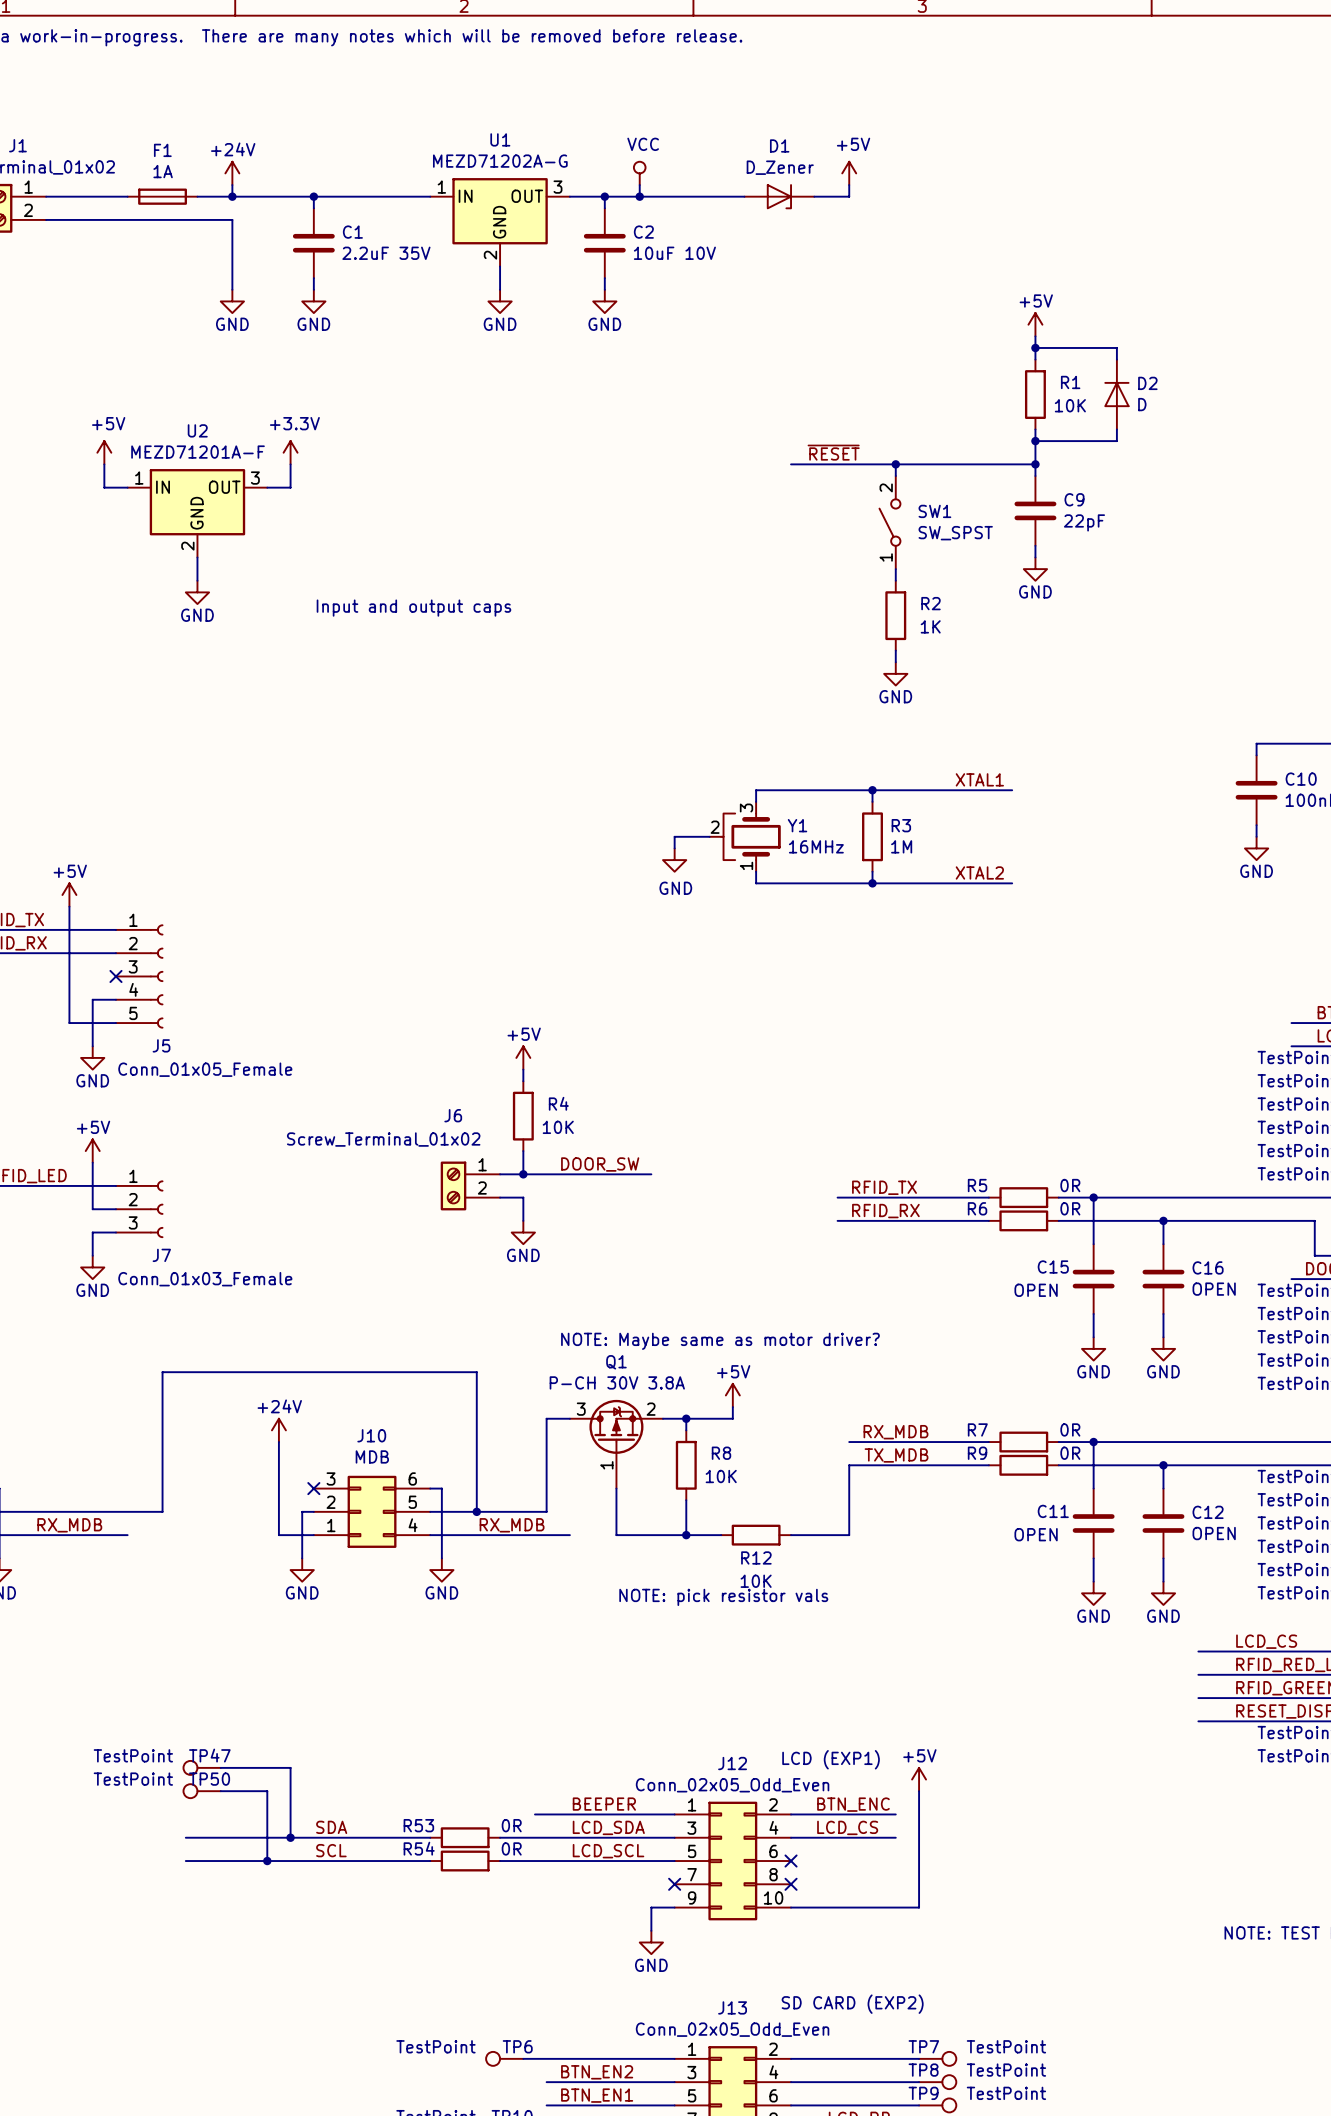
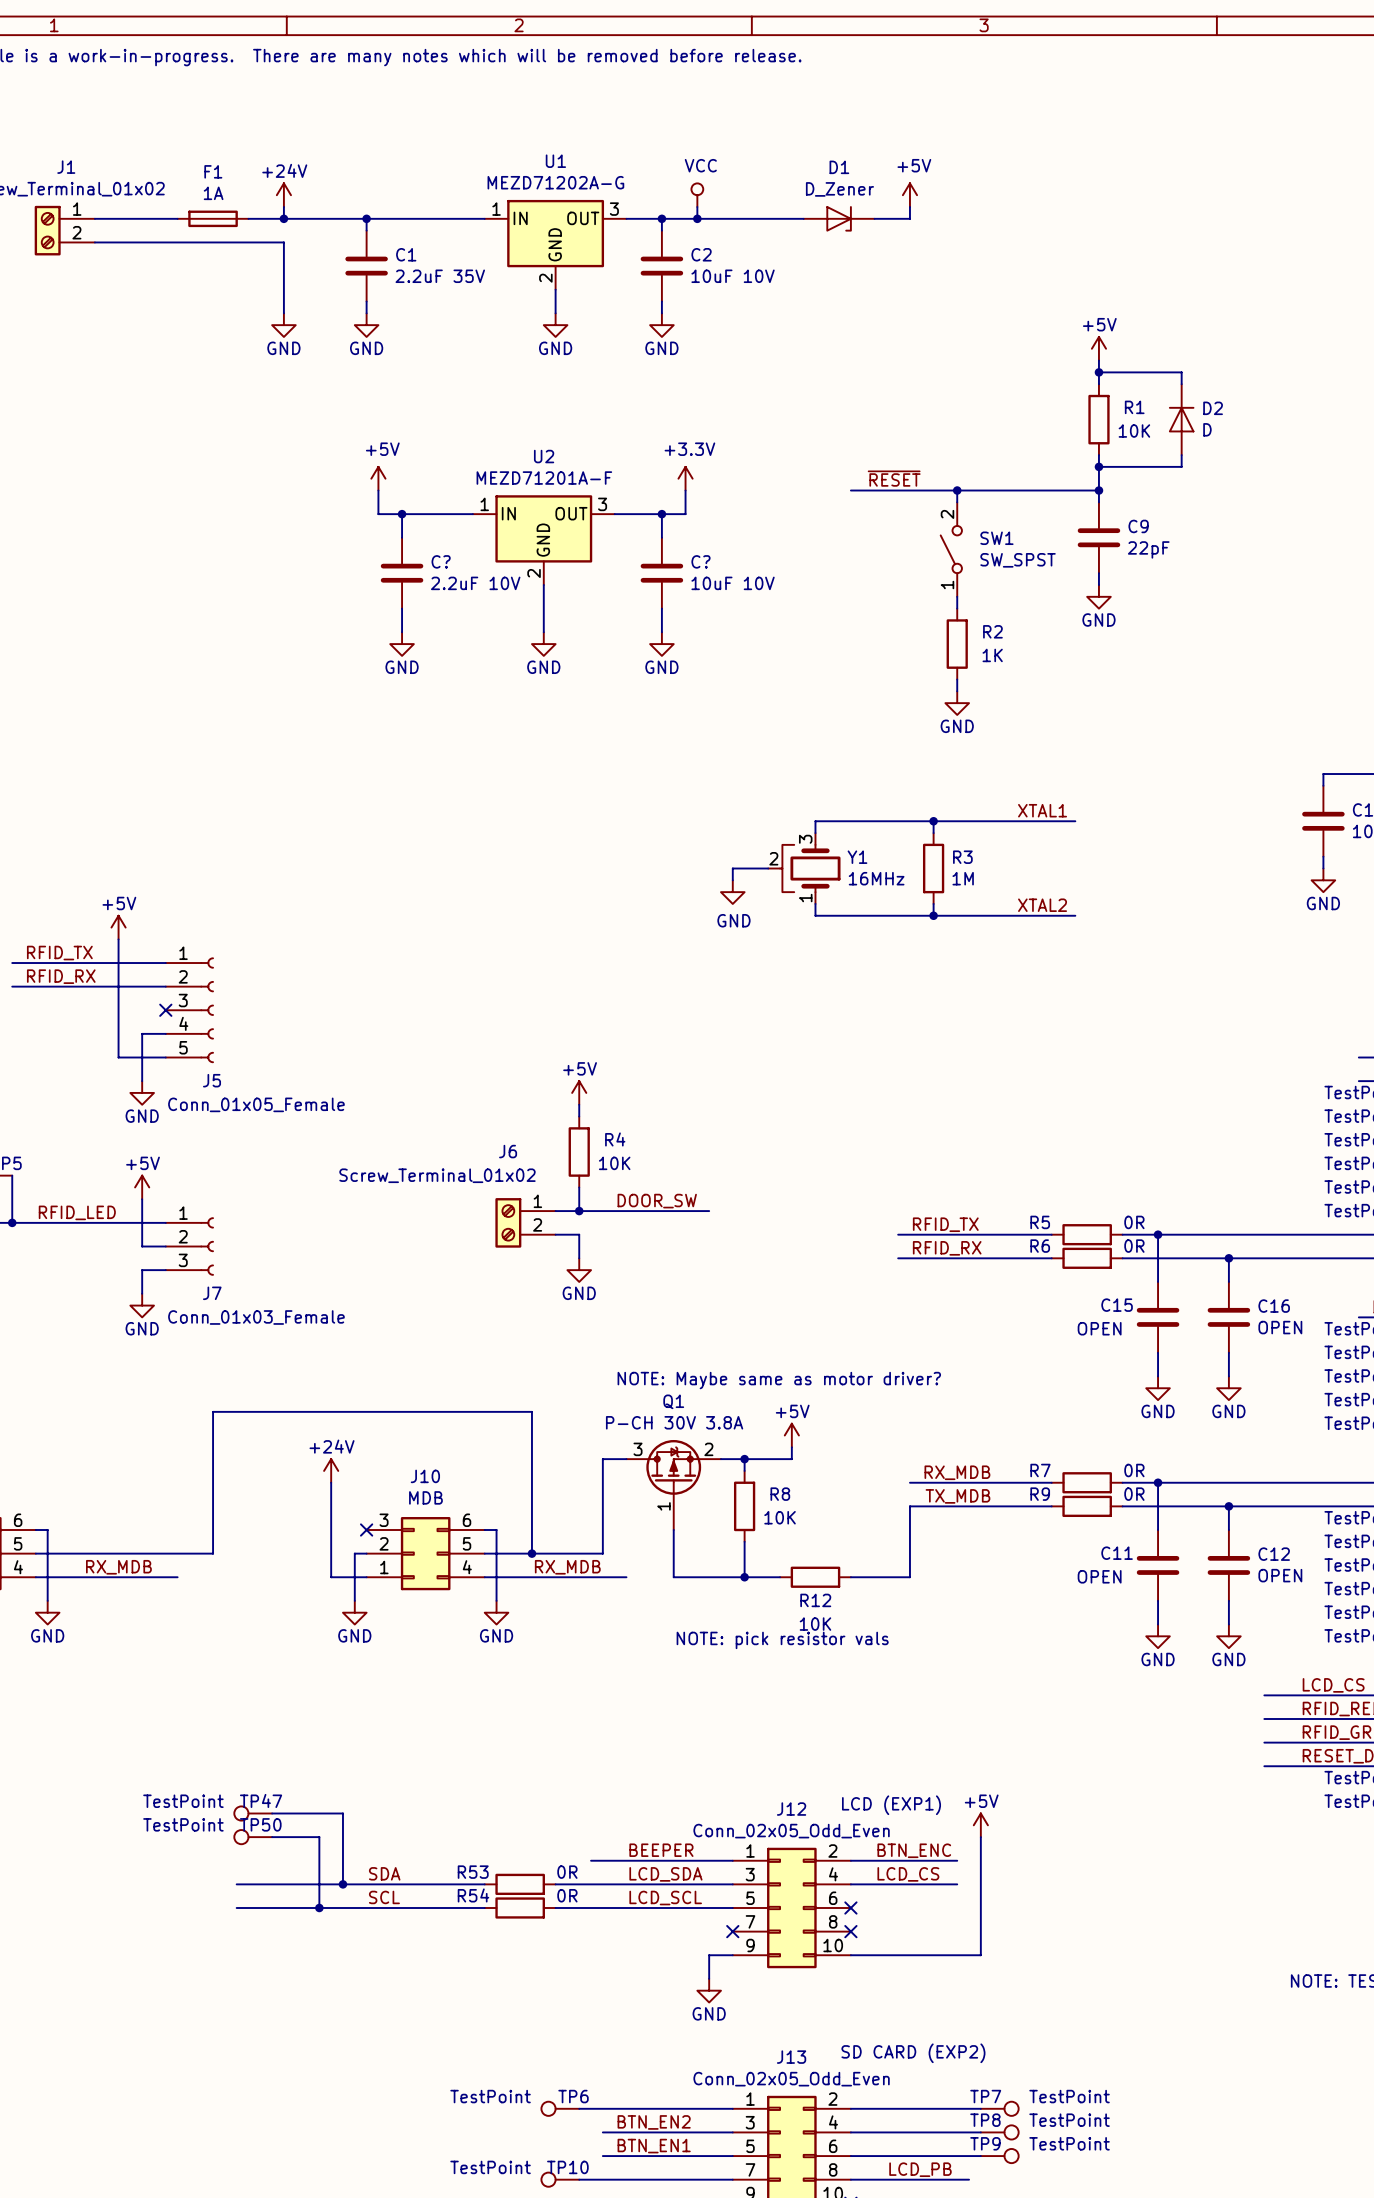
power symbol position: +5V (104, 452) -> +5V (378, 478)
power symbol: +3.3V (290, 452) -> none
power symbol: none -> +3.3V (685, 478)
wire: (104, 464) (104, 487) (127, 487) -> none
wire: (290, 464) (290, 487) (267, 487) -> none
wire: none -> (378, 490) (378, 514) (472, 514)
wire: none -> (685, 490) (685, 514) (614, 514)
wire: none -> (402, 514) (402, 537)
junction: none -> (402, 514)
wire: none -> (661, 514) (661, 537)
junction: none -> (661, 514)
U2 position: (197, 513) -> (543, 540)
C?: none -> 2.2uF 10V (402, 573)
C?: none -> 10uF 10V (661, 573)
wire: (197, 557) (197, 580) -> (402, 608) (402, 632)
wire: none -> (543, 585) (543, 632)
wire: none -> (661, 608) (661, 632)
power symbol: GND (197, 592) -> none
text: Input and output caps (413, 608) -> none
power symbol: none -> GND (402, 644)
power symbol: none -> GND (543, 644)
power symbol: none -> GND (661, 644)

